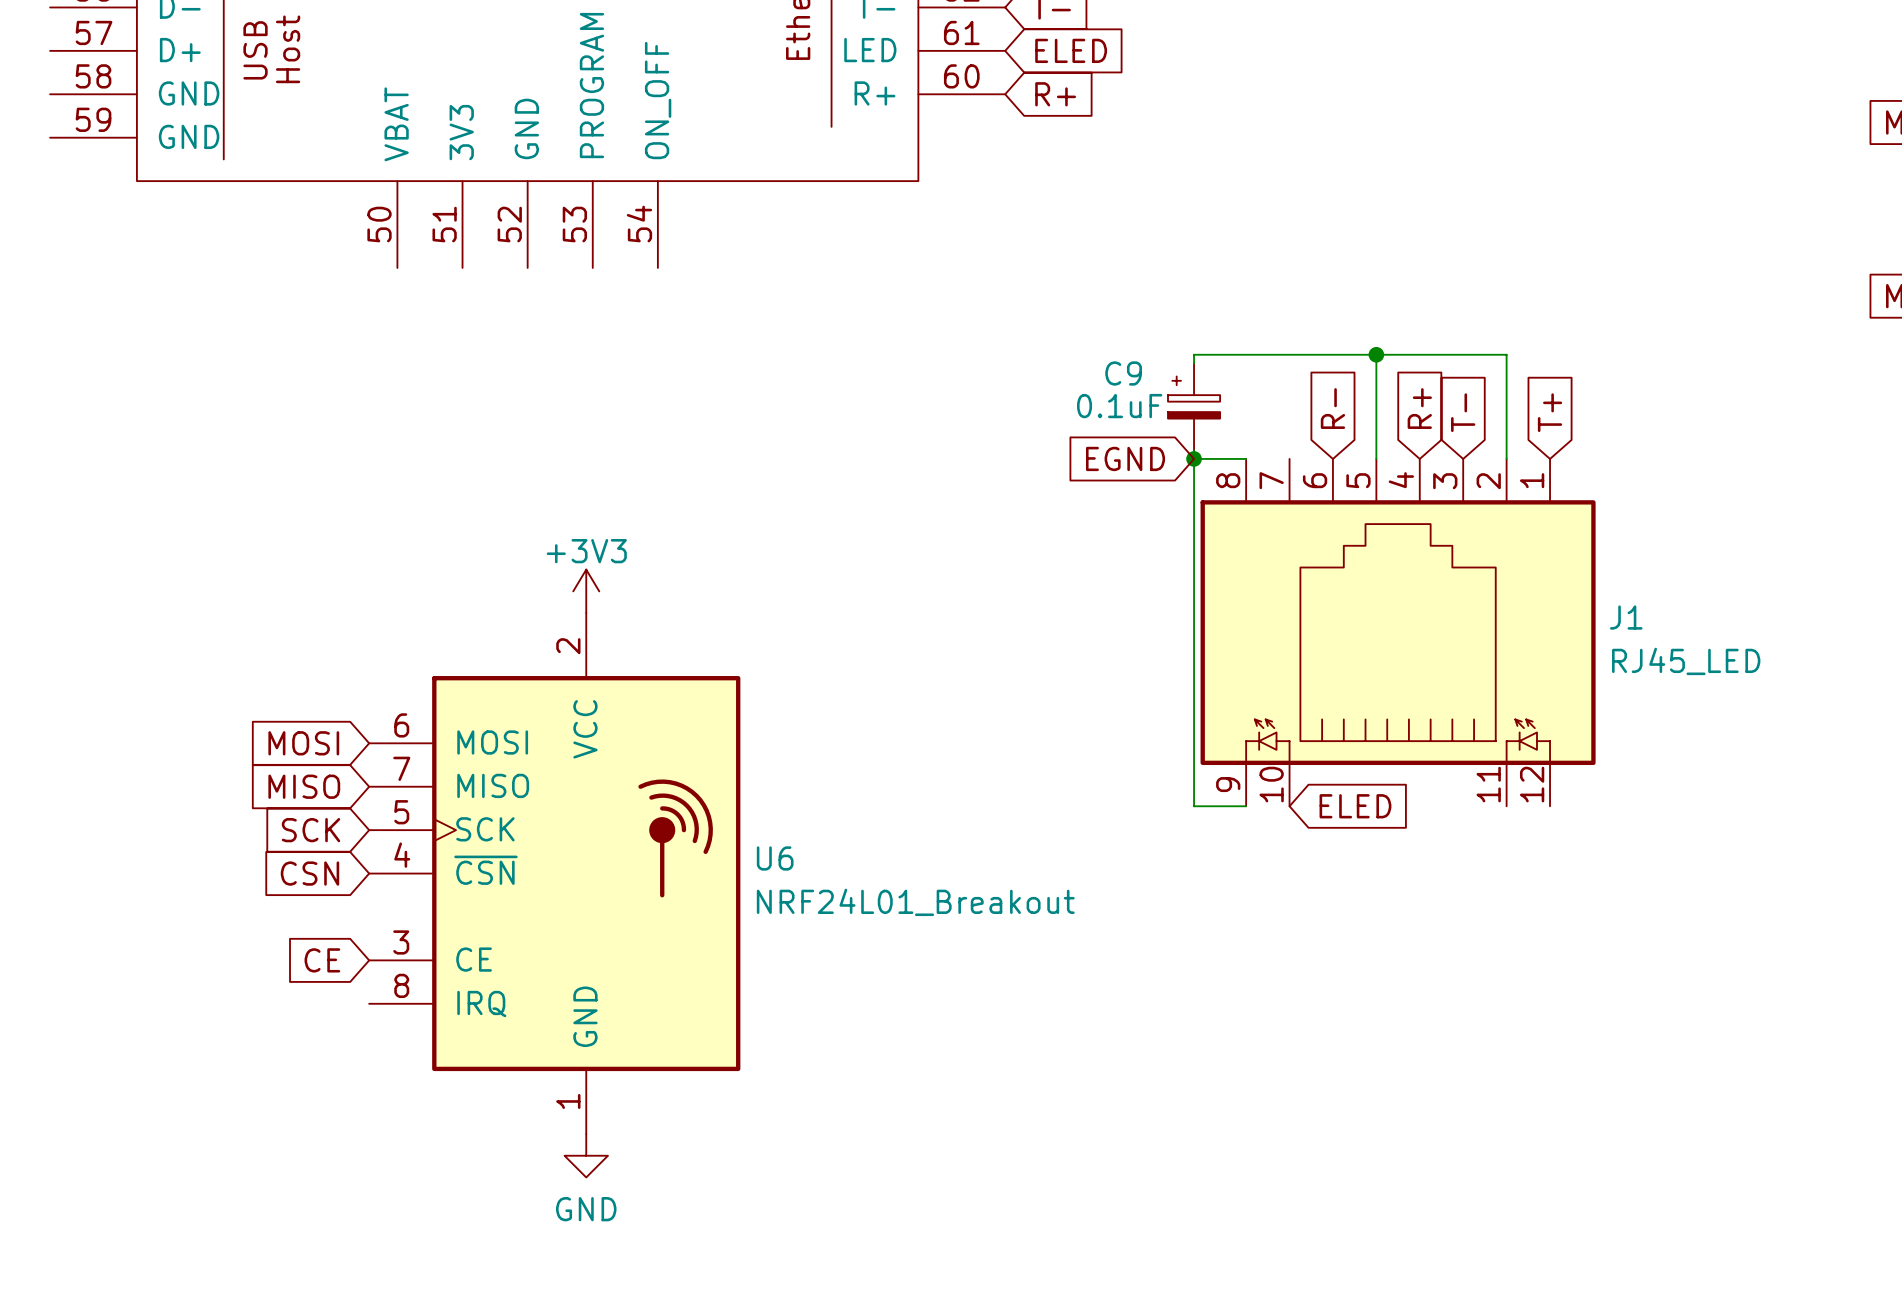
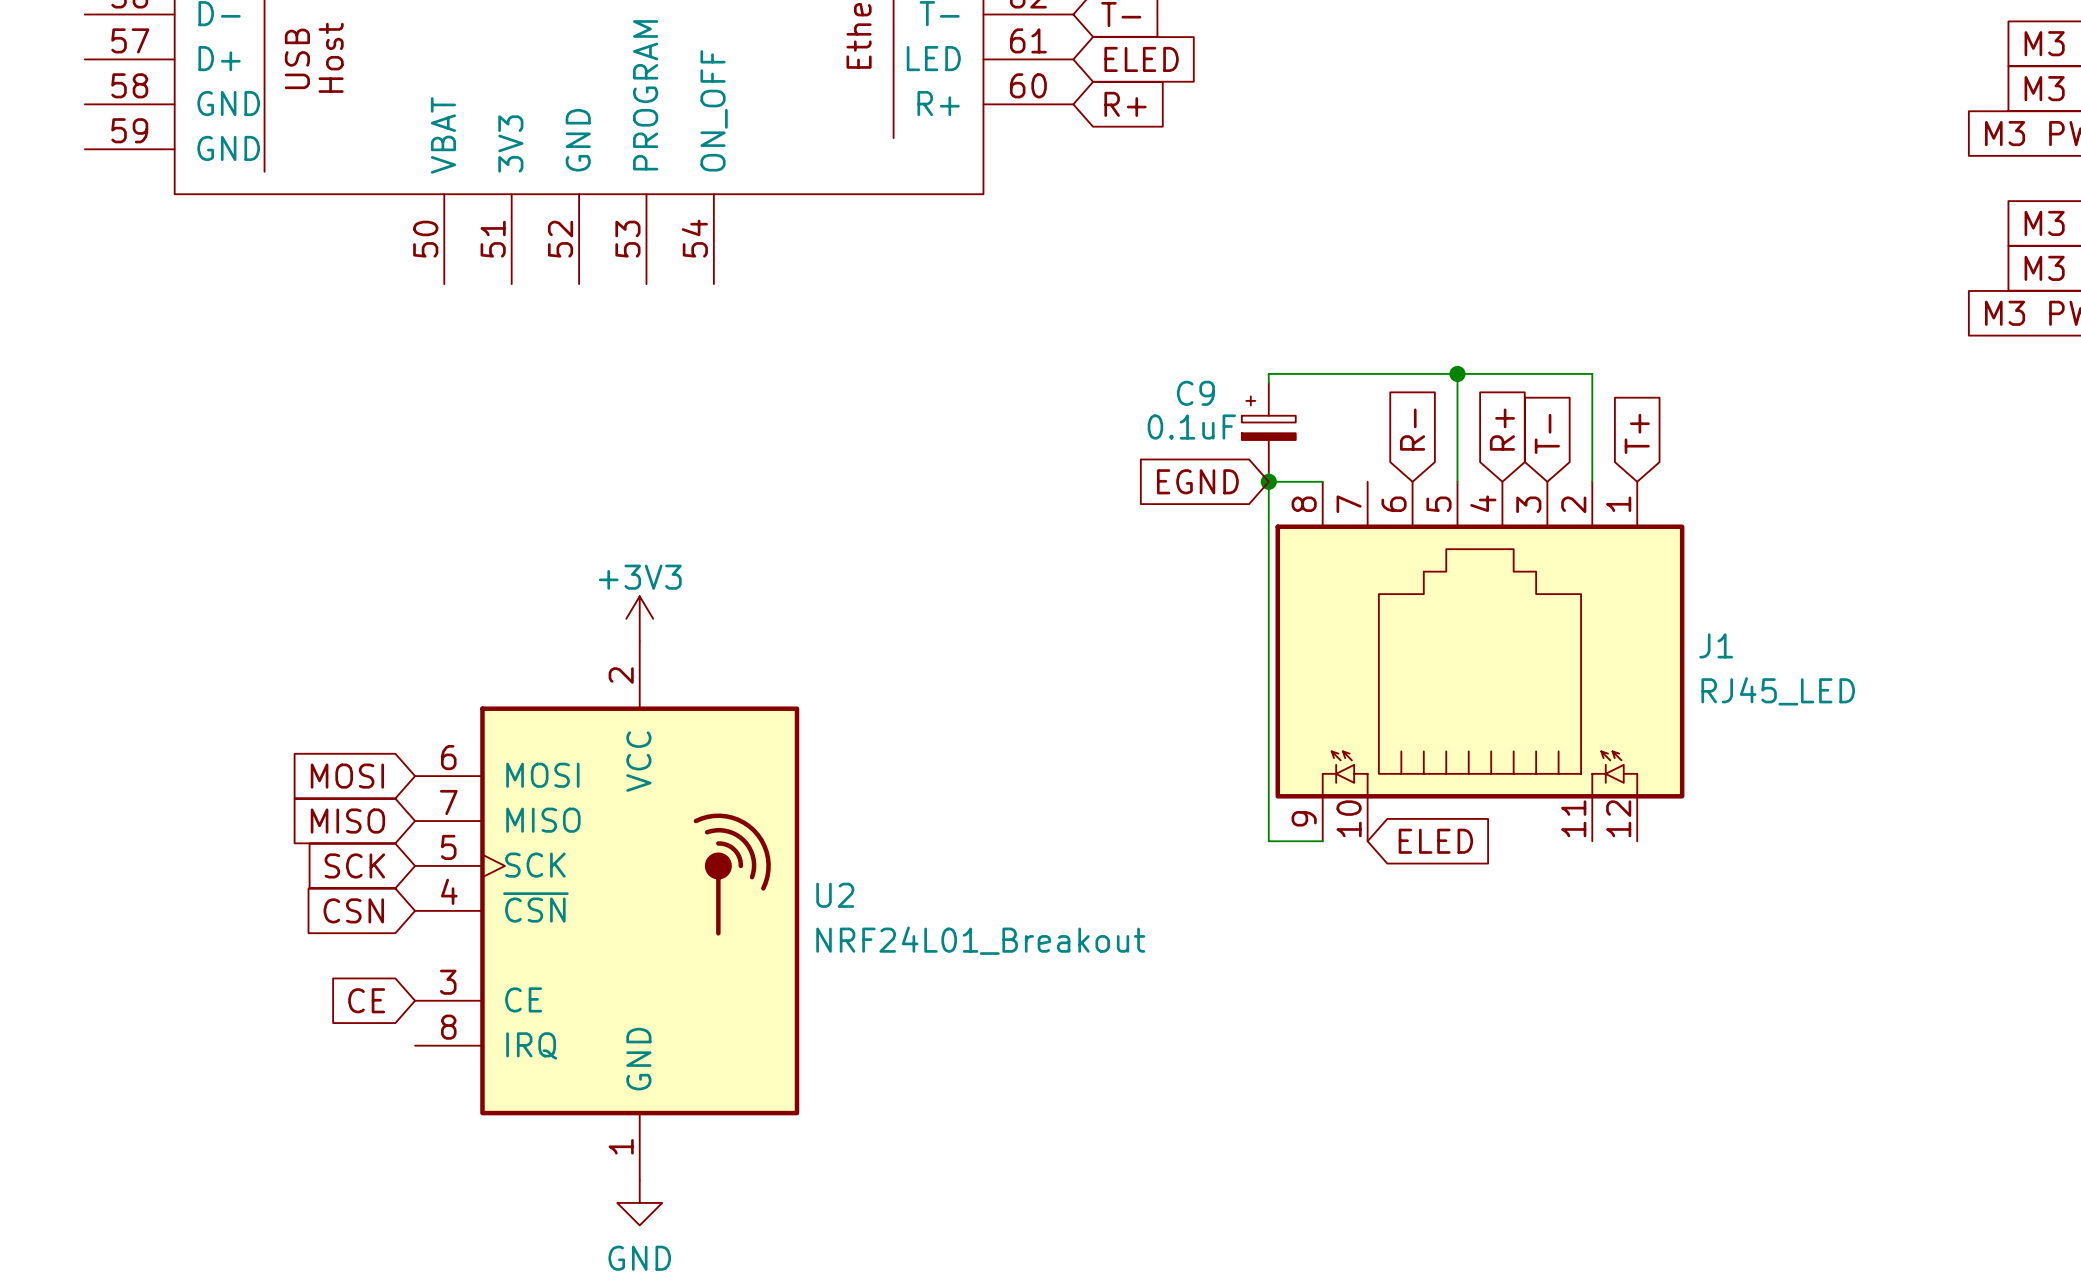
U6 name: U6 (775, 858) -> U2 (835, 895)

